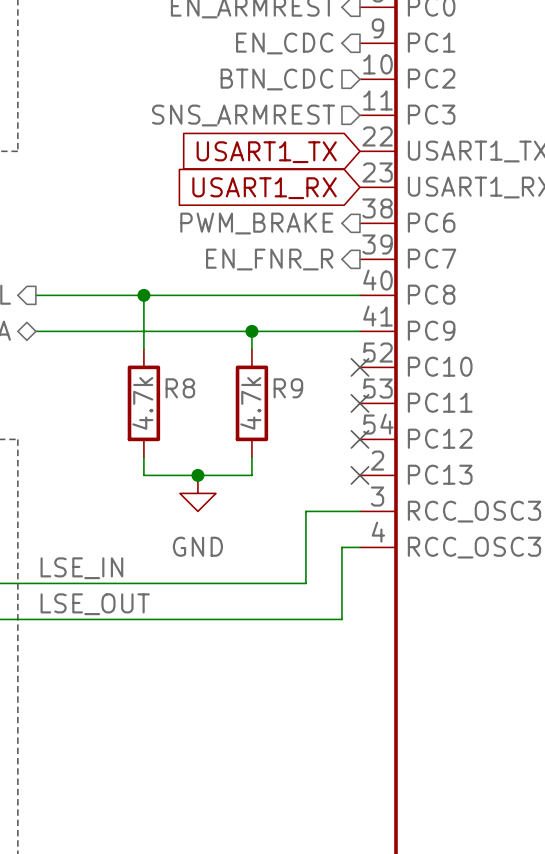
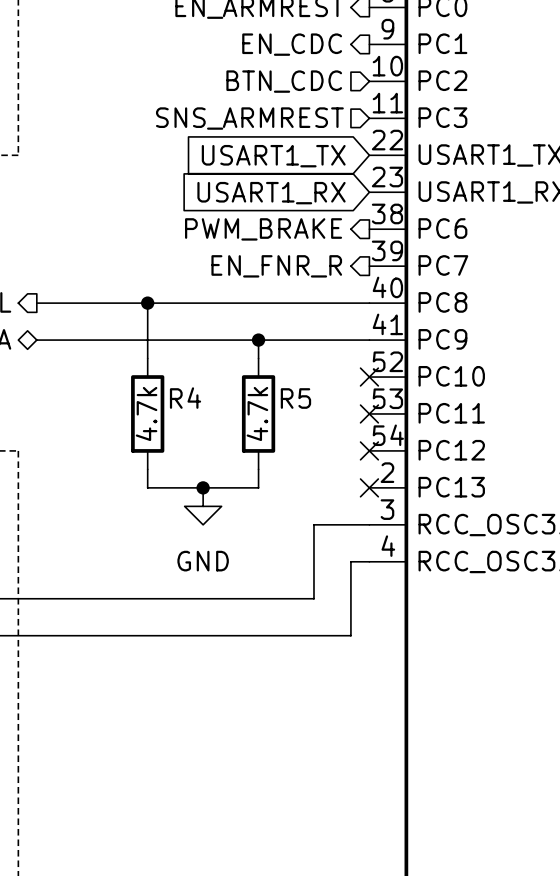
R8 name: R8 (180, 388) -> R4 (185, 398)
R9 name: R9 (288, 388) -> R5 (295, 398)
label: LSE_IN (81, 568) -> none
label: LSE_OUT (95, 604) -> none

